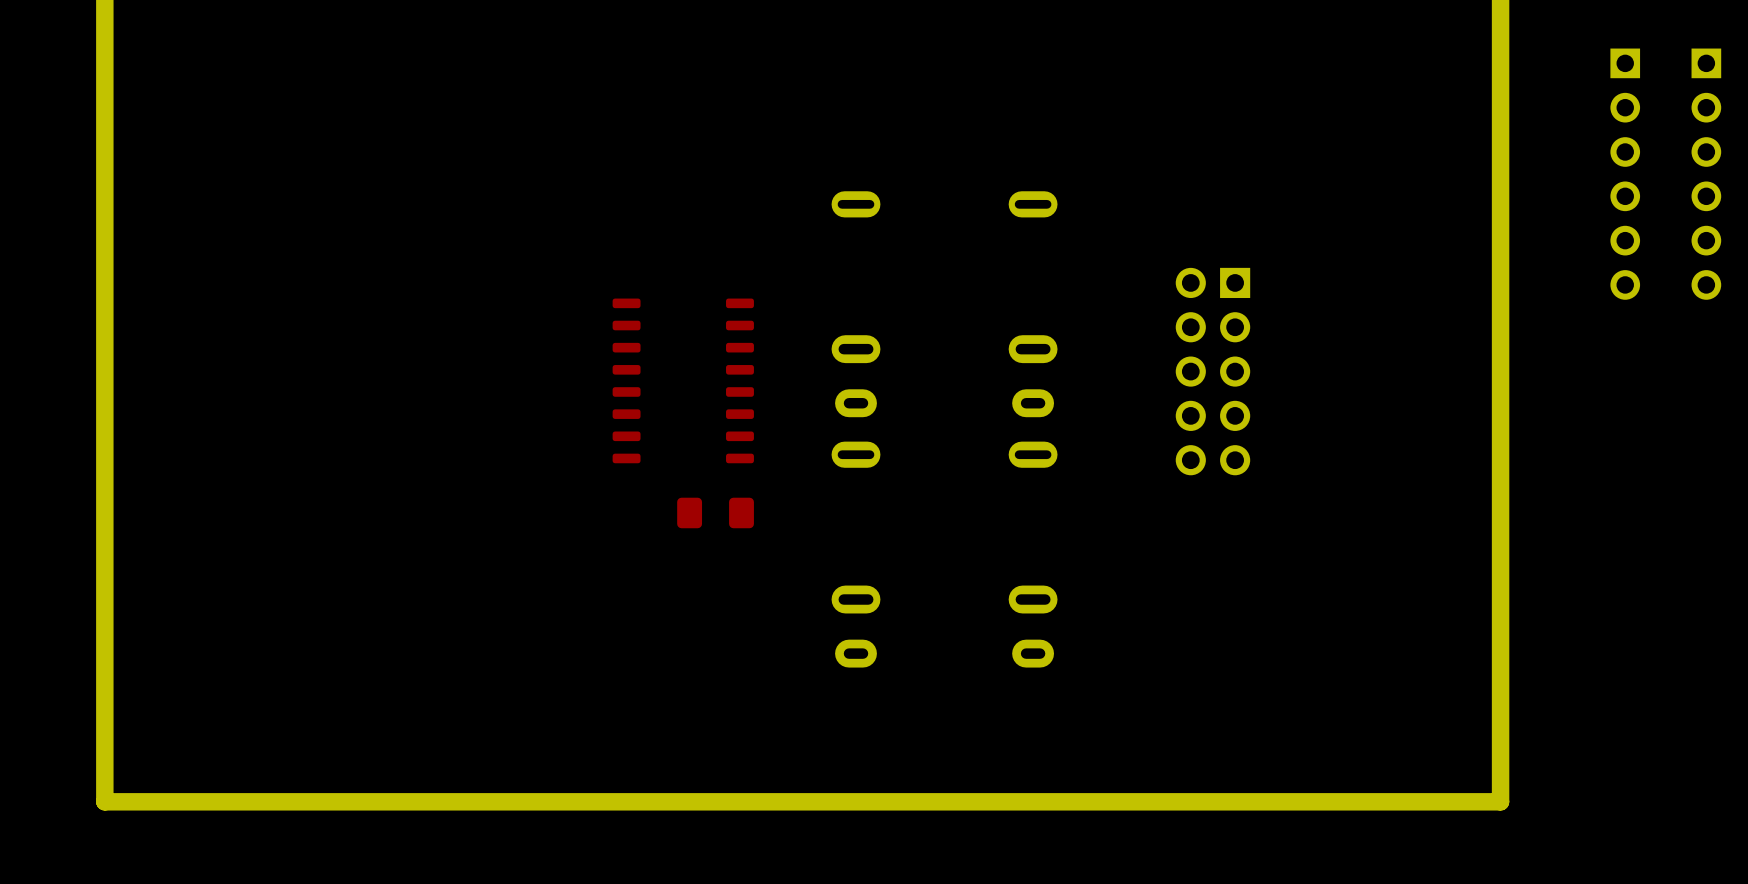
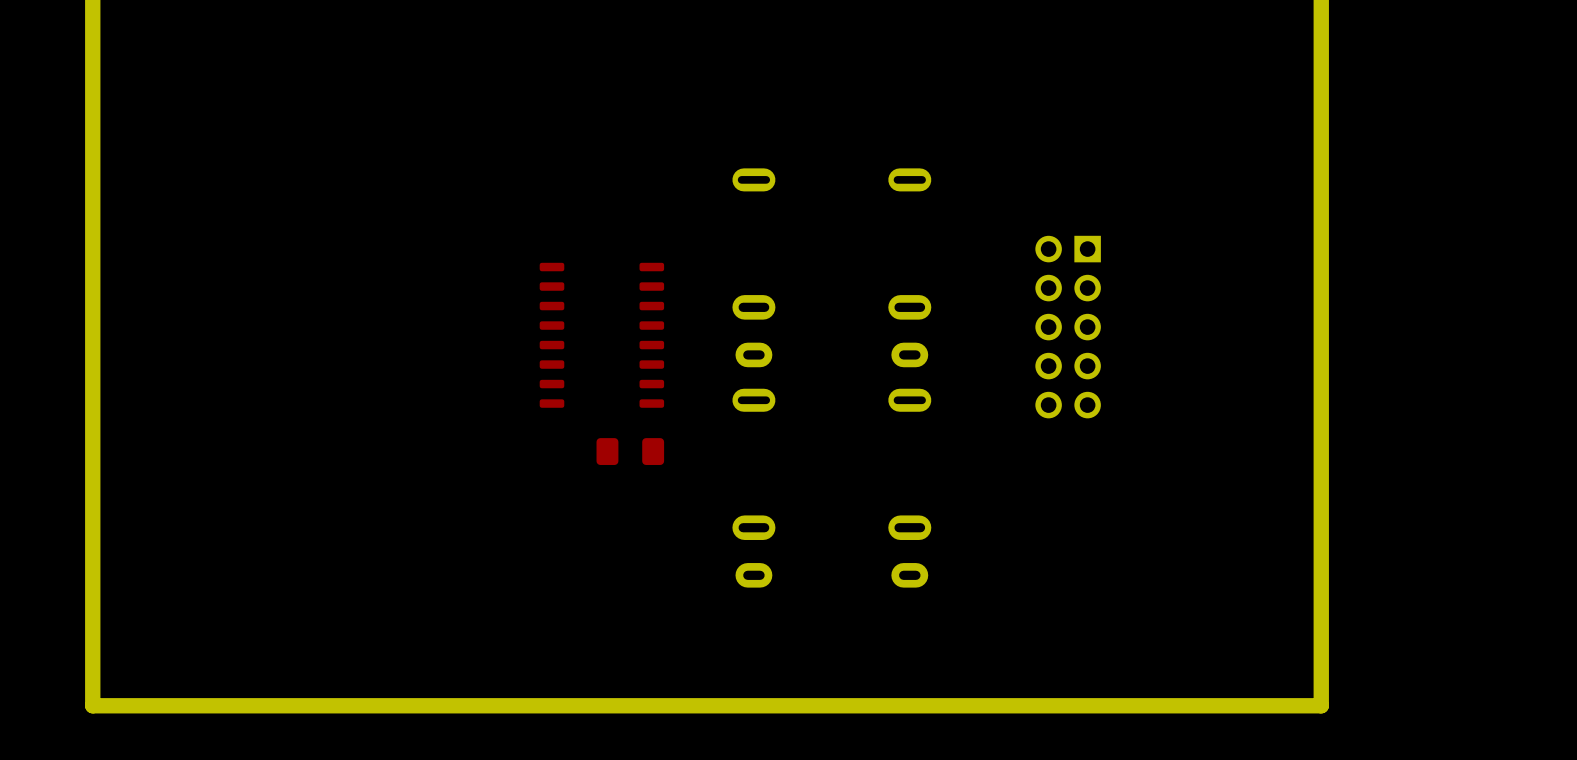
part: (1625, 174) -> none
part: (1706, 174) -> none

